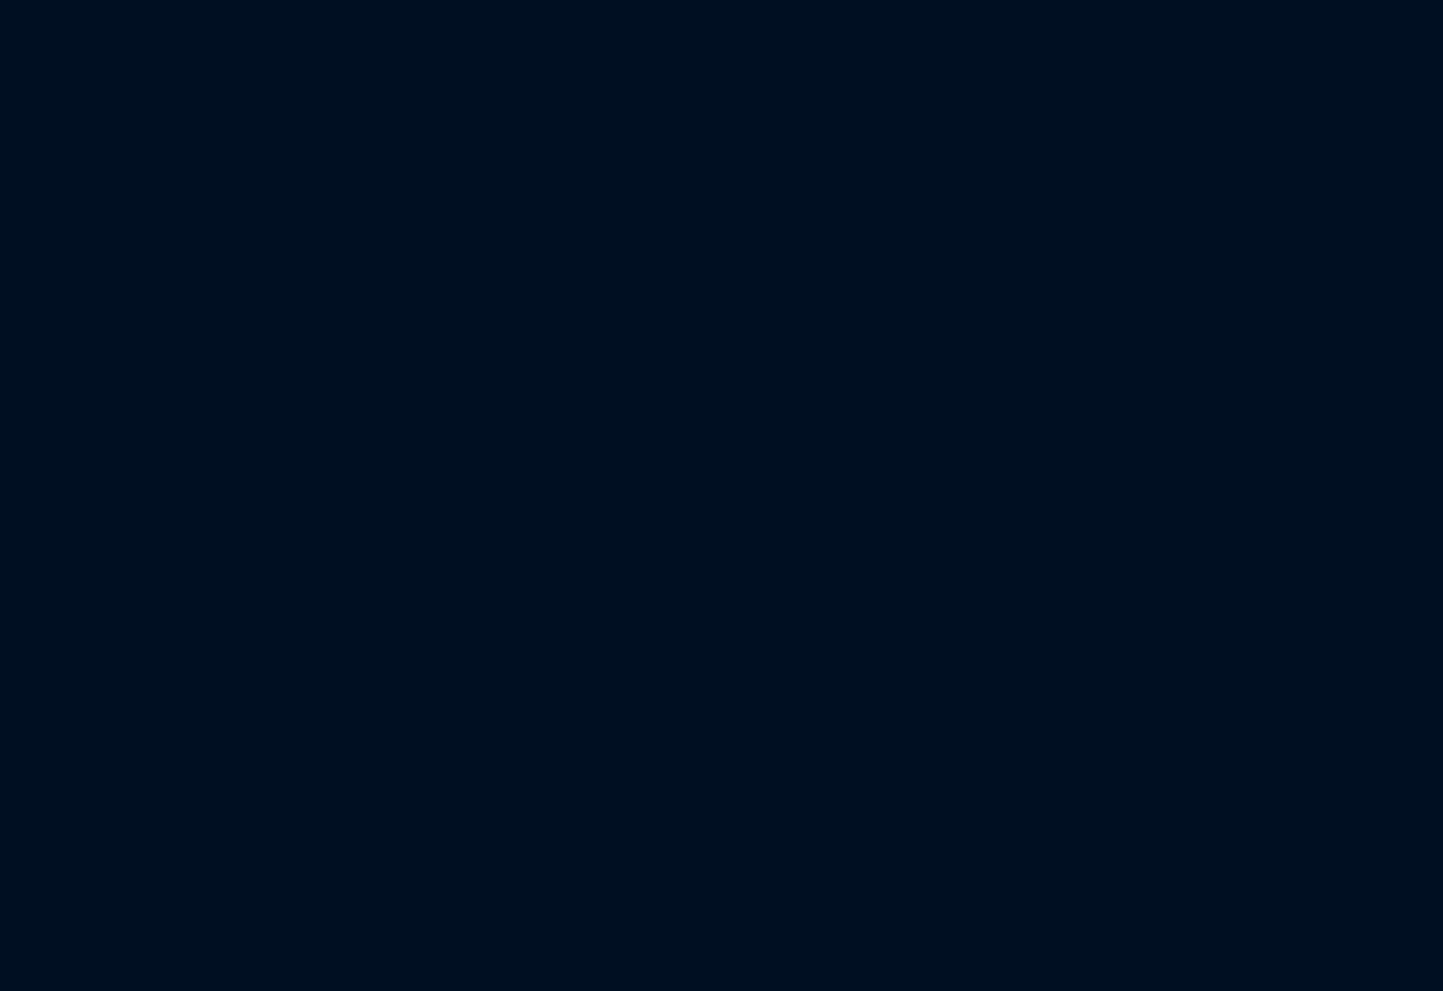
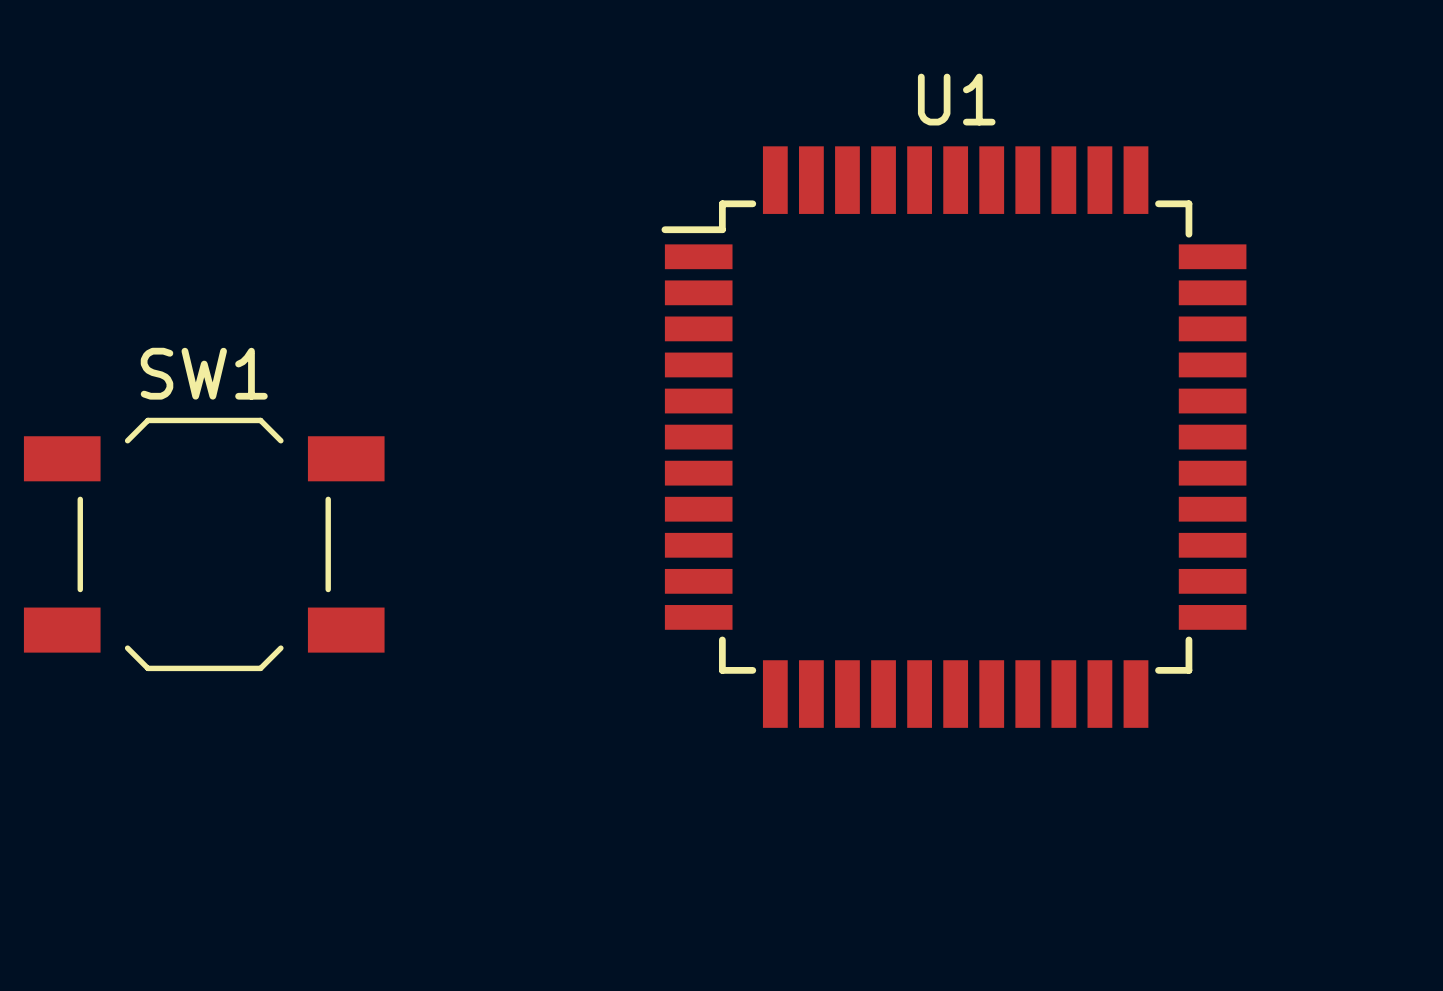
U1: none -> (953, 437)
SW1: none -> (204, 544)

